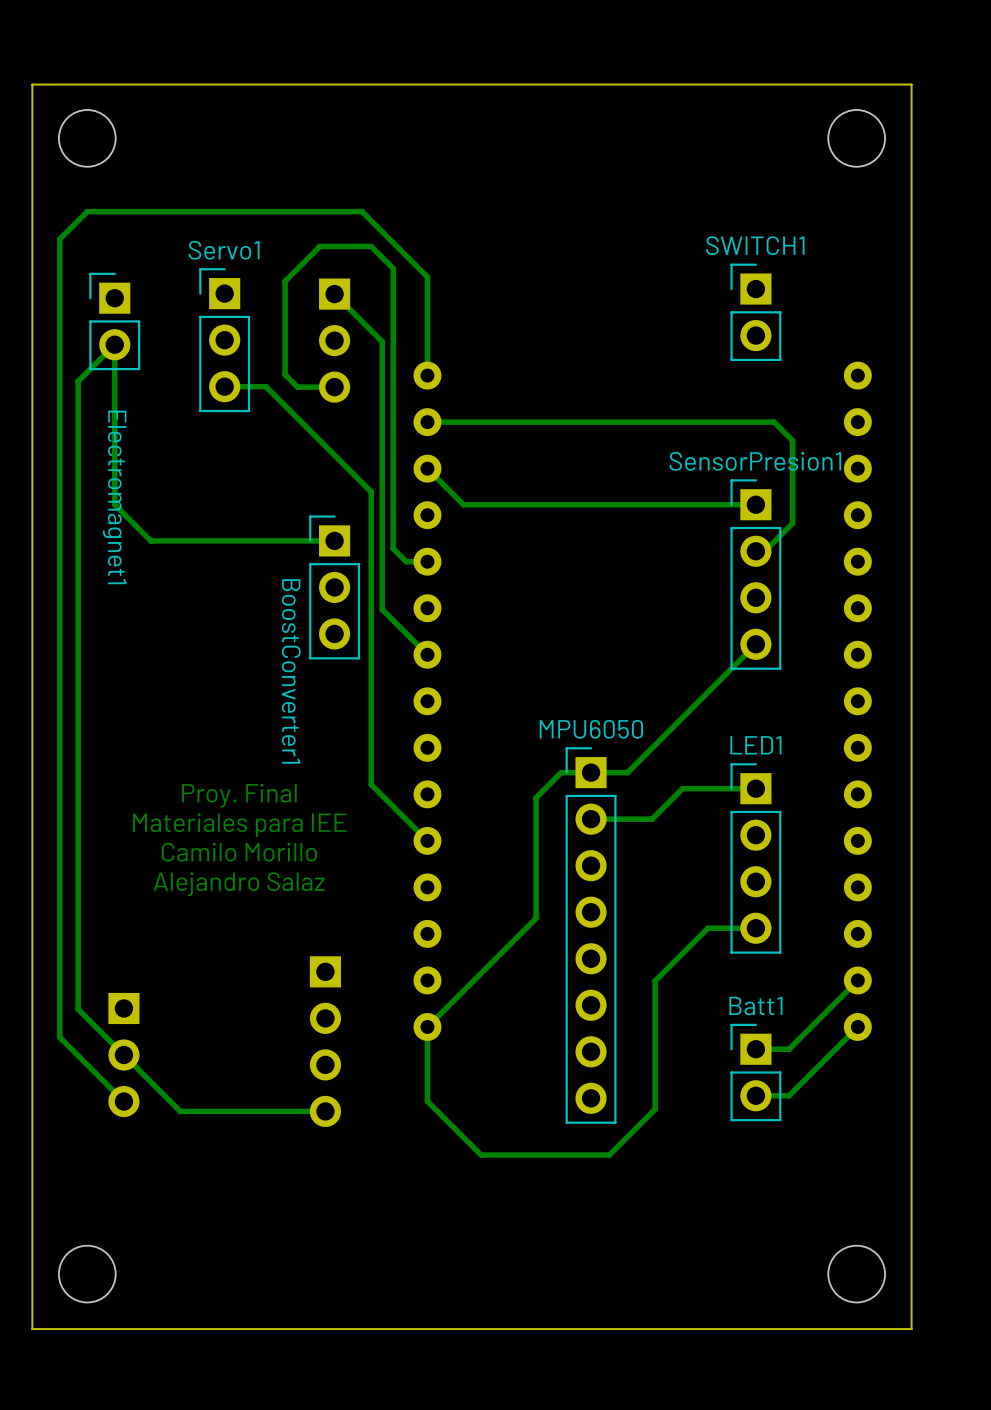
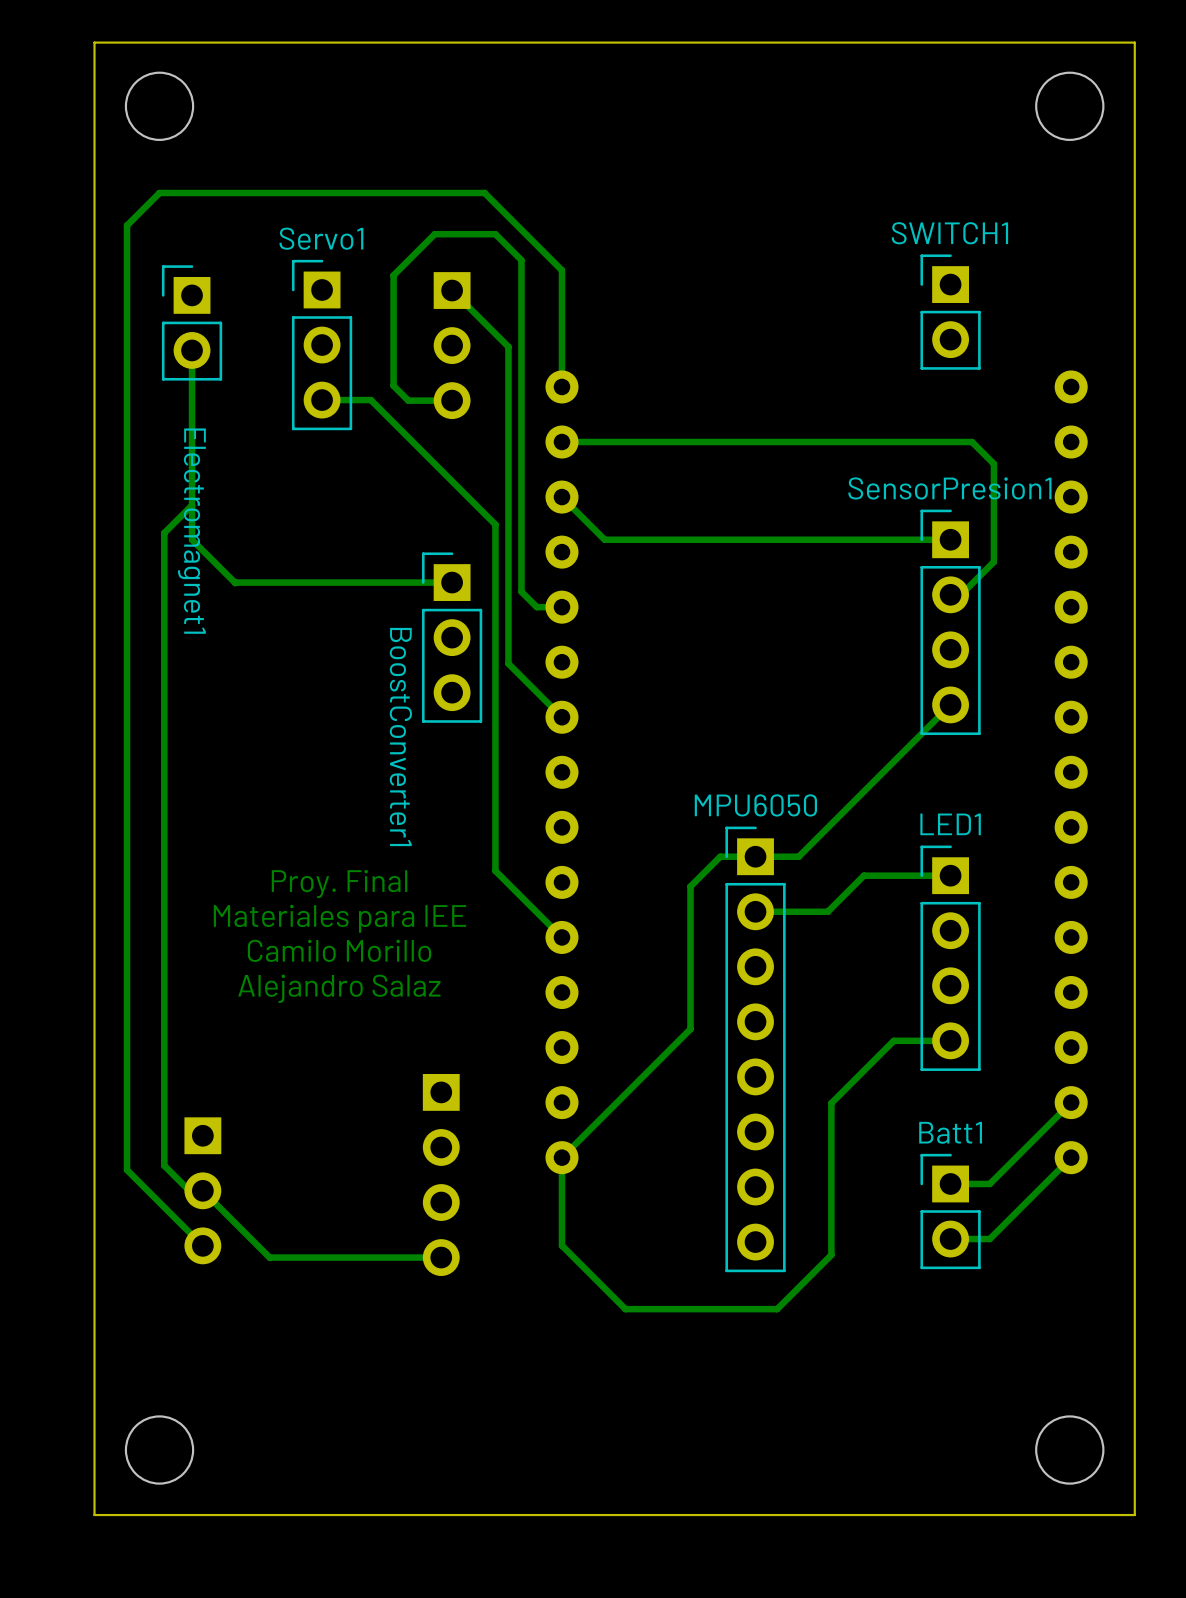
track: (114, 344) (78, 381) (78, 1009) (123, 1055) -> (192, 505) (164, 533) (164, 1165) (191, 1193) (200, 1193) (202, 1190)

